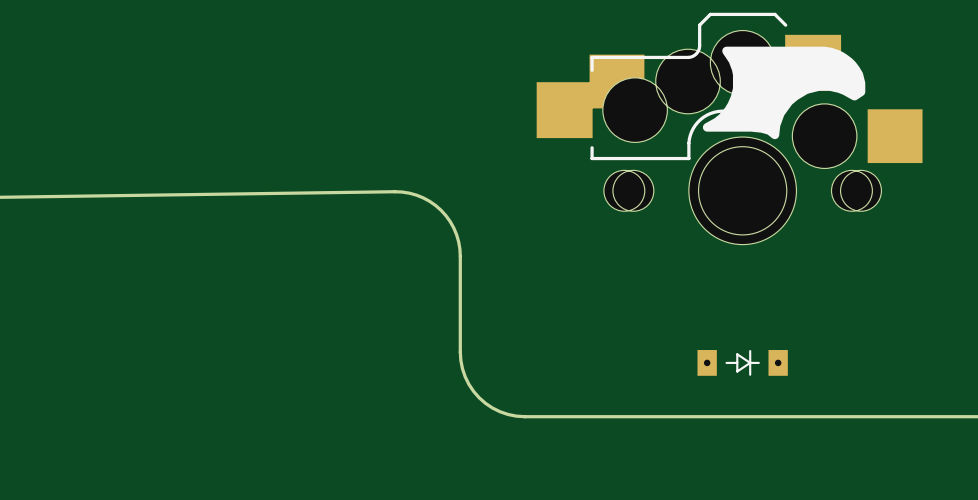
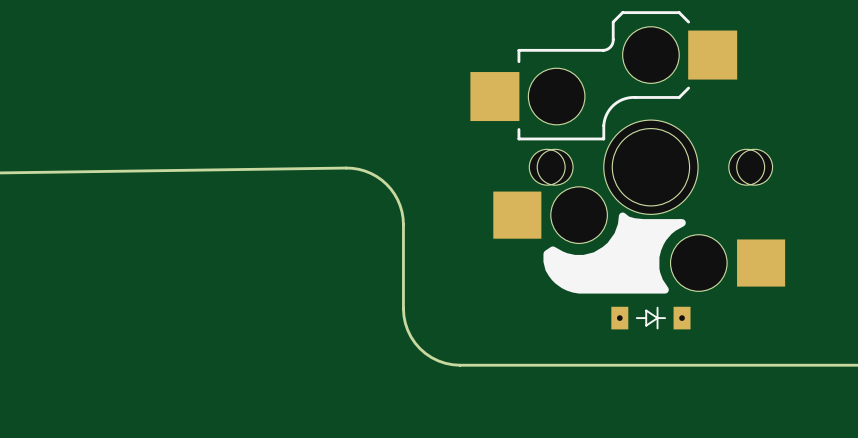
part rotation: 0° (756, 140) -> 180° (639, 211)

